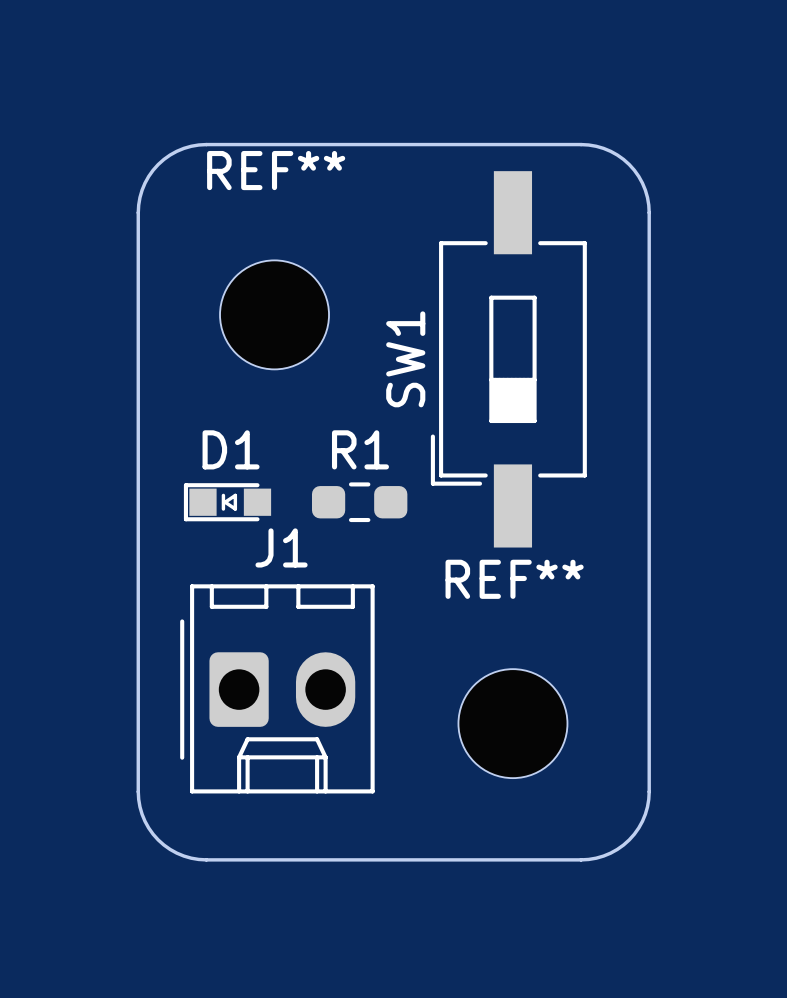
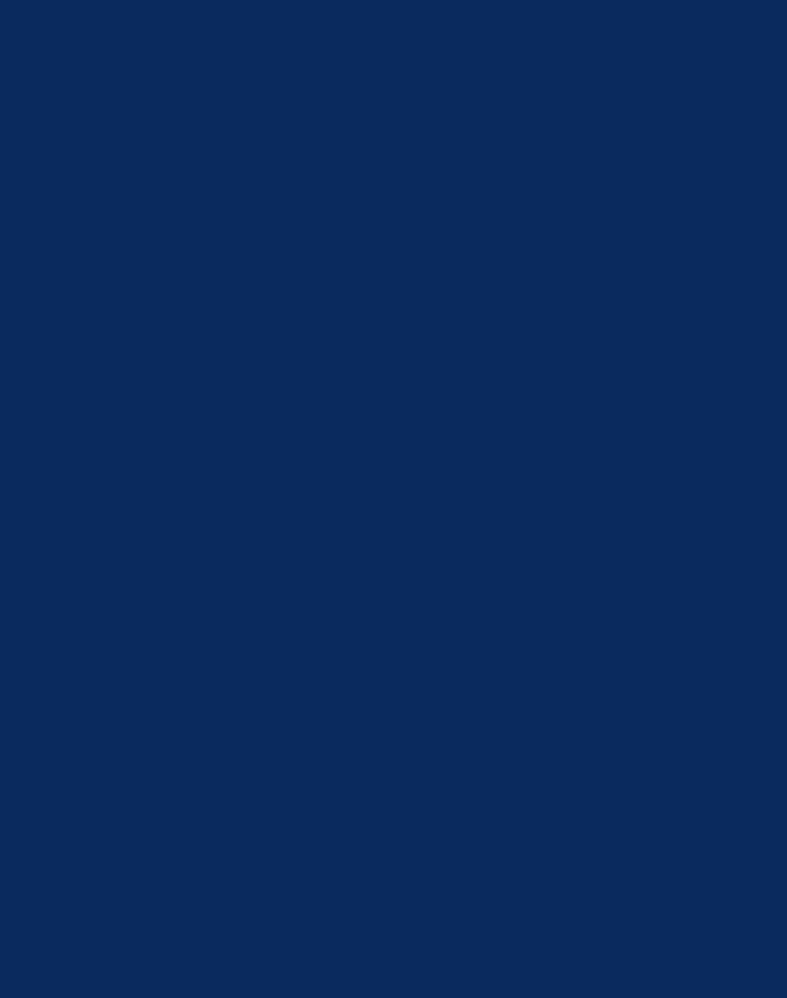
board edge: (206, 144) (588, 145) (603, 148) (617, 155) (629, 164) (638, 176) (645, 190) (649, 212) (649, 791) (645, 814) (638, 828) (629, 839) (617, 849) (596, 858) (581, 859) (206, 859) (183, 856) (170, 849) (158, 839) (148, 828) (142, 814) (138, 791) (138, 205) (145, 183) (158, 164) (176, 151) (191, 146) (206, 144) -> none
REF**: (274, 314) -> none
SW1: (508, 359) -> none
D1: (227, 502) -> none
R1: (359, 502) -> none
J1: (277, 688) -> none
REF**: (512, 723) -> none

